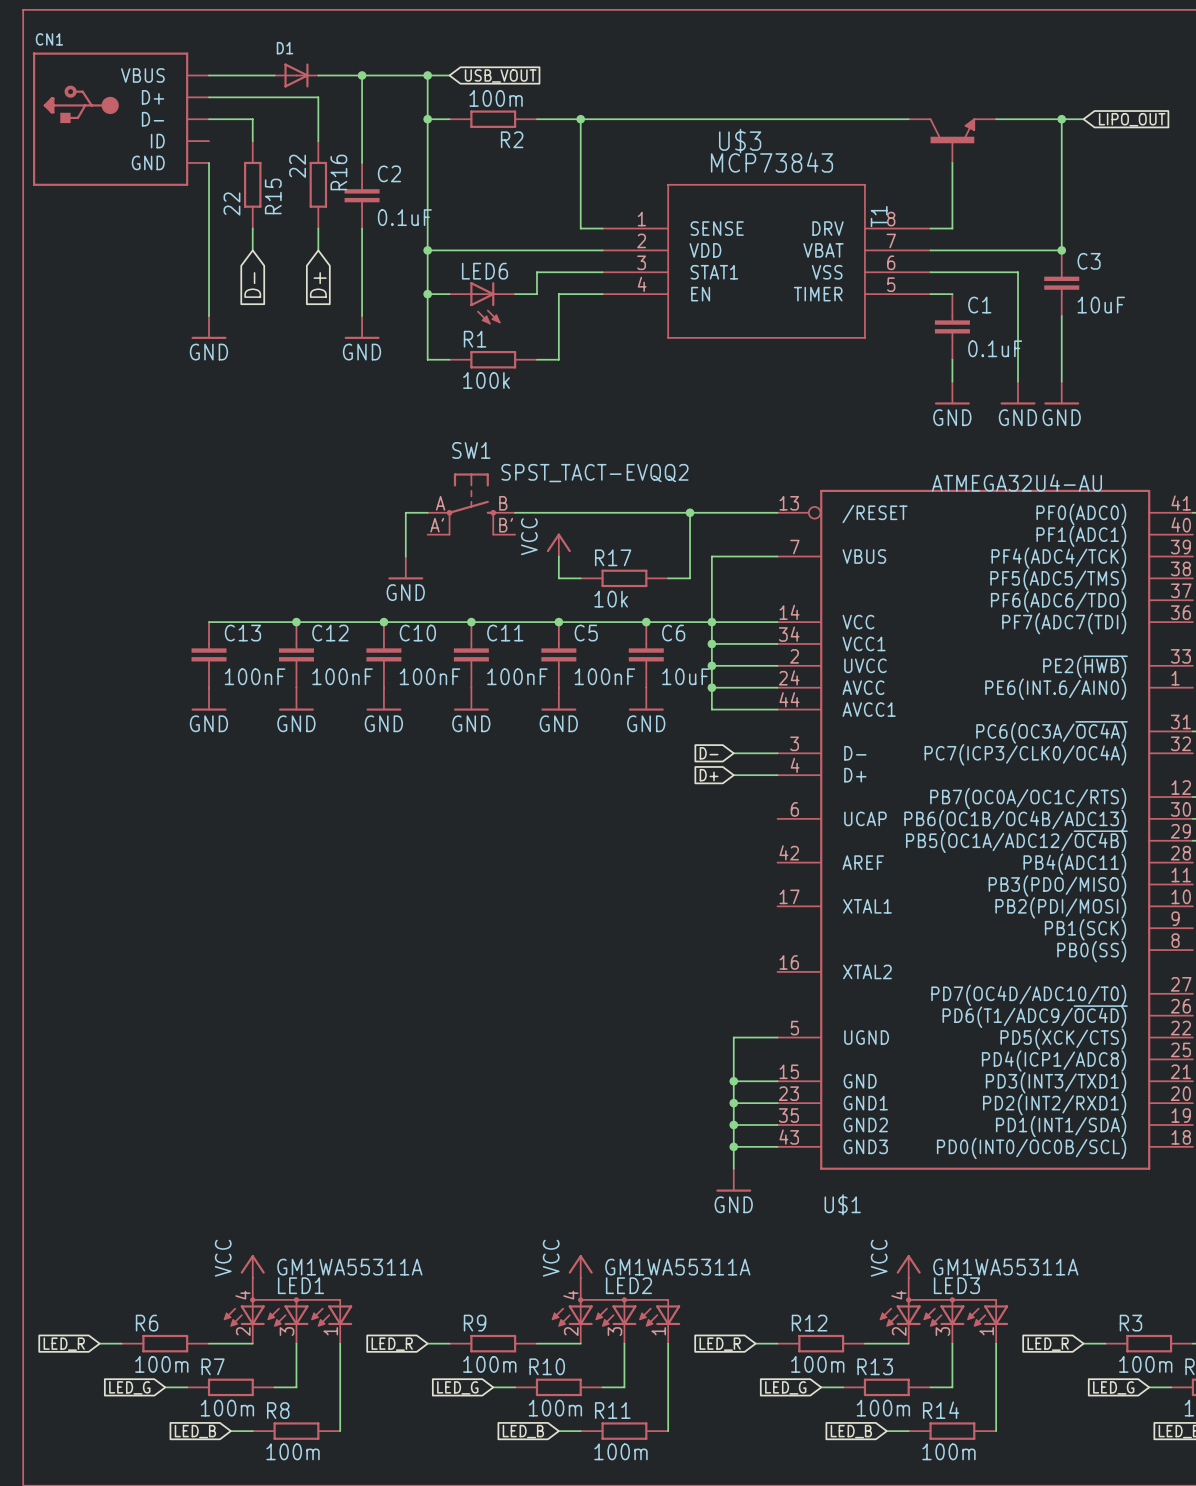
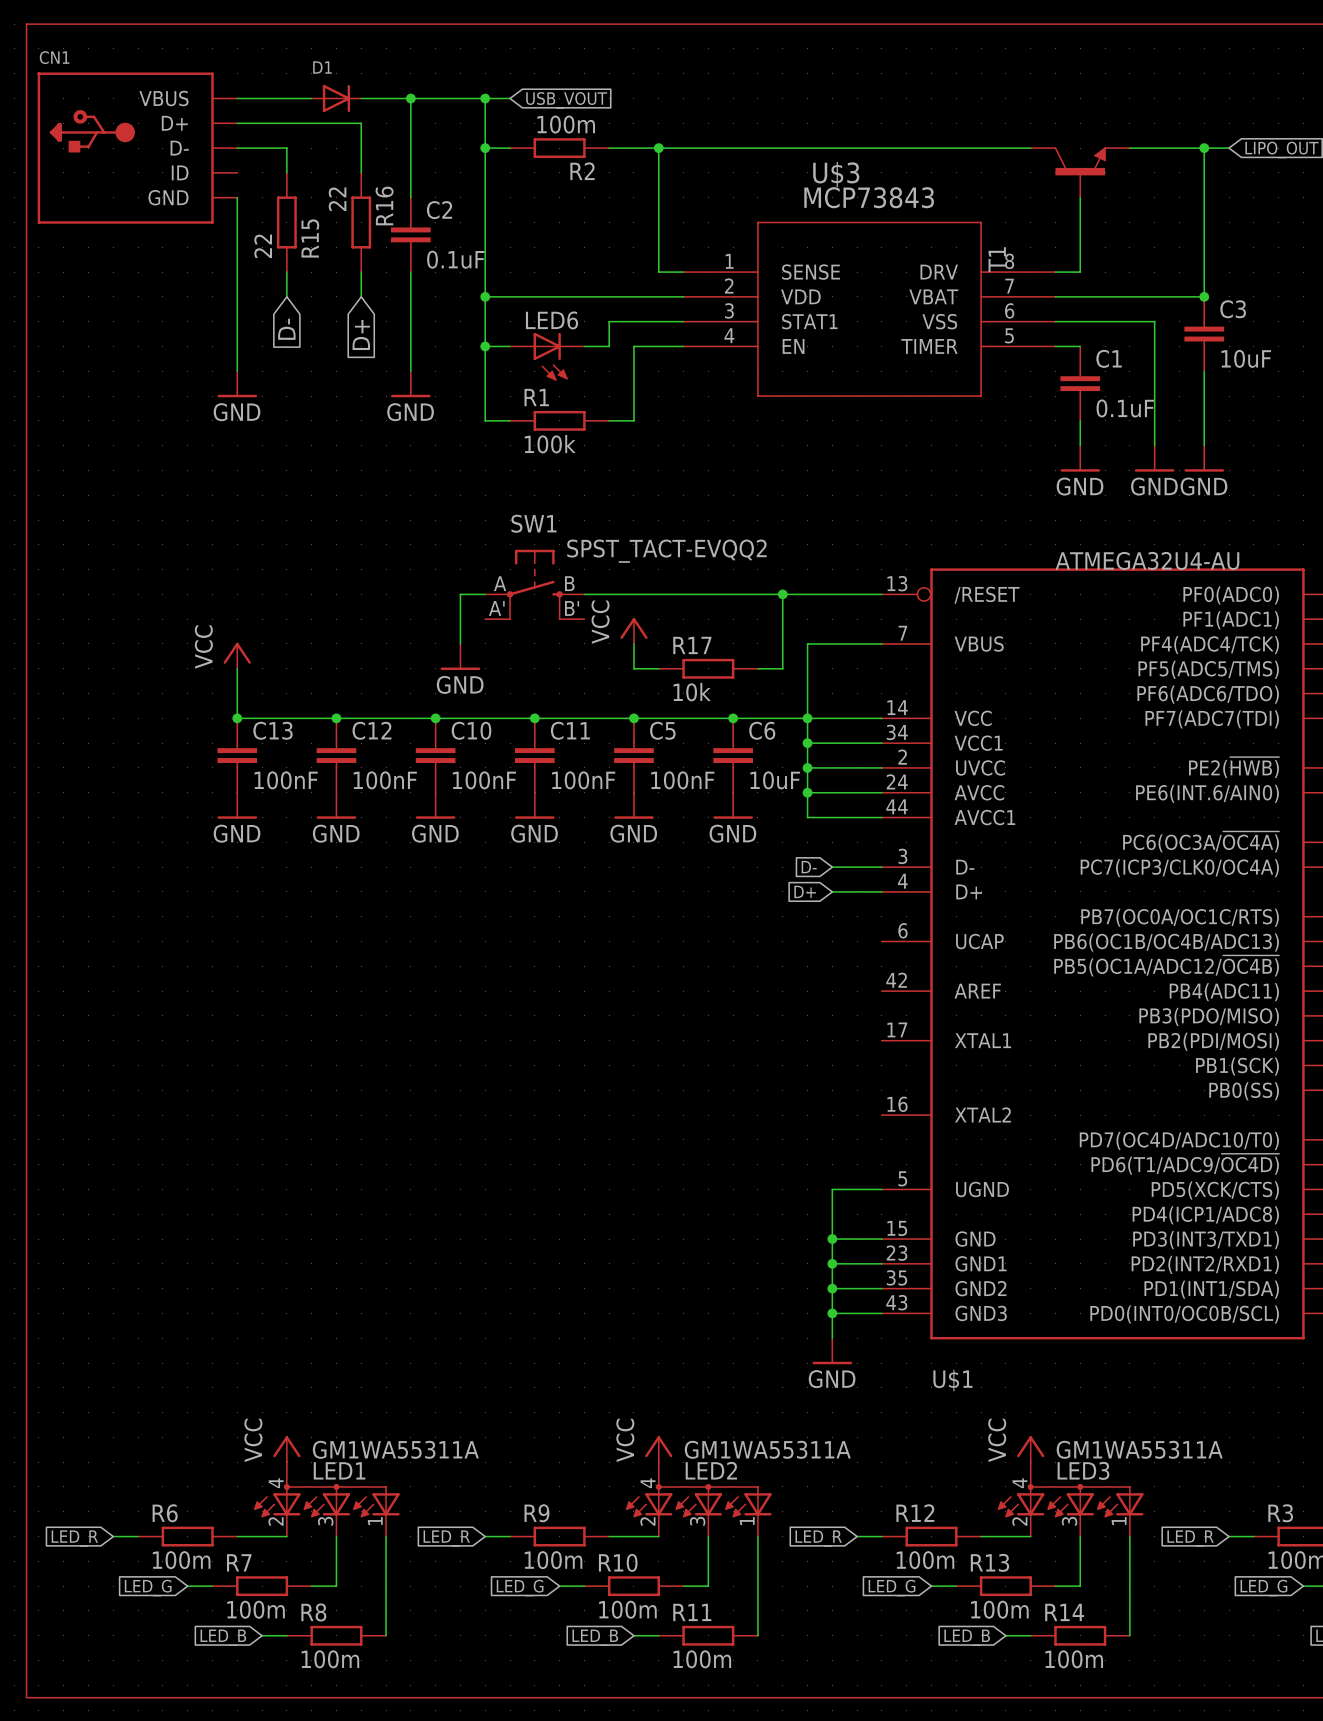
power symbol: none -> VCC (237, 655)
wire: none -> (237, 668) (237, 718)
junction: none -> (237, 718)

